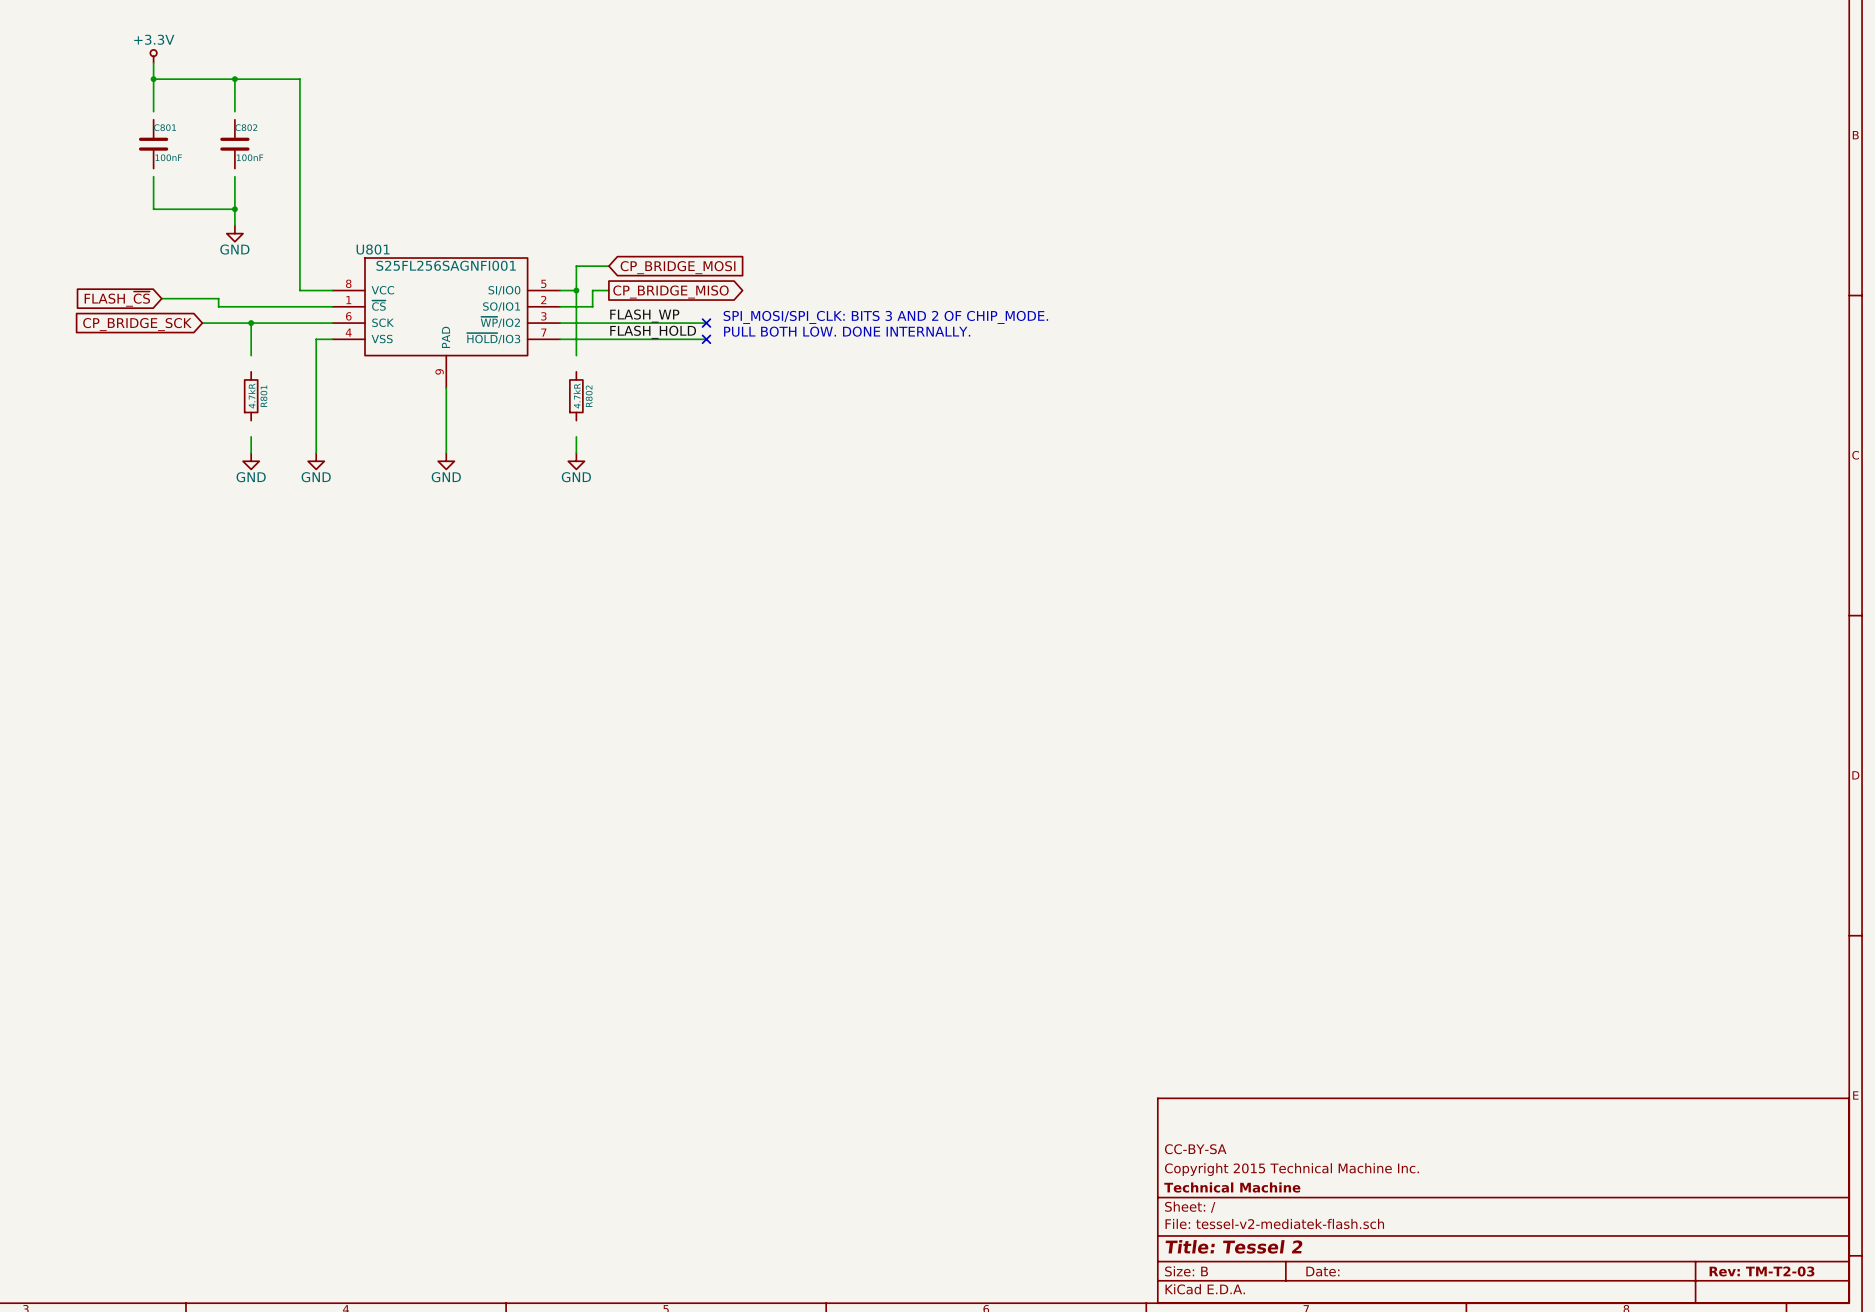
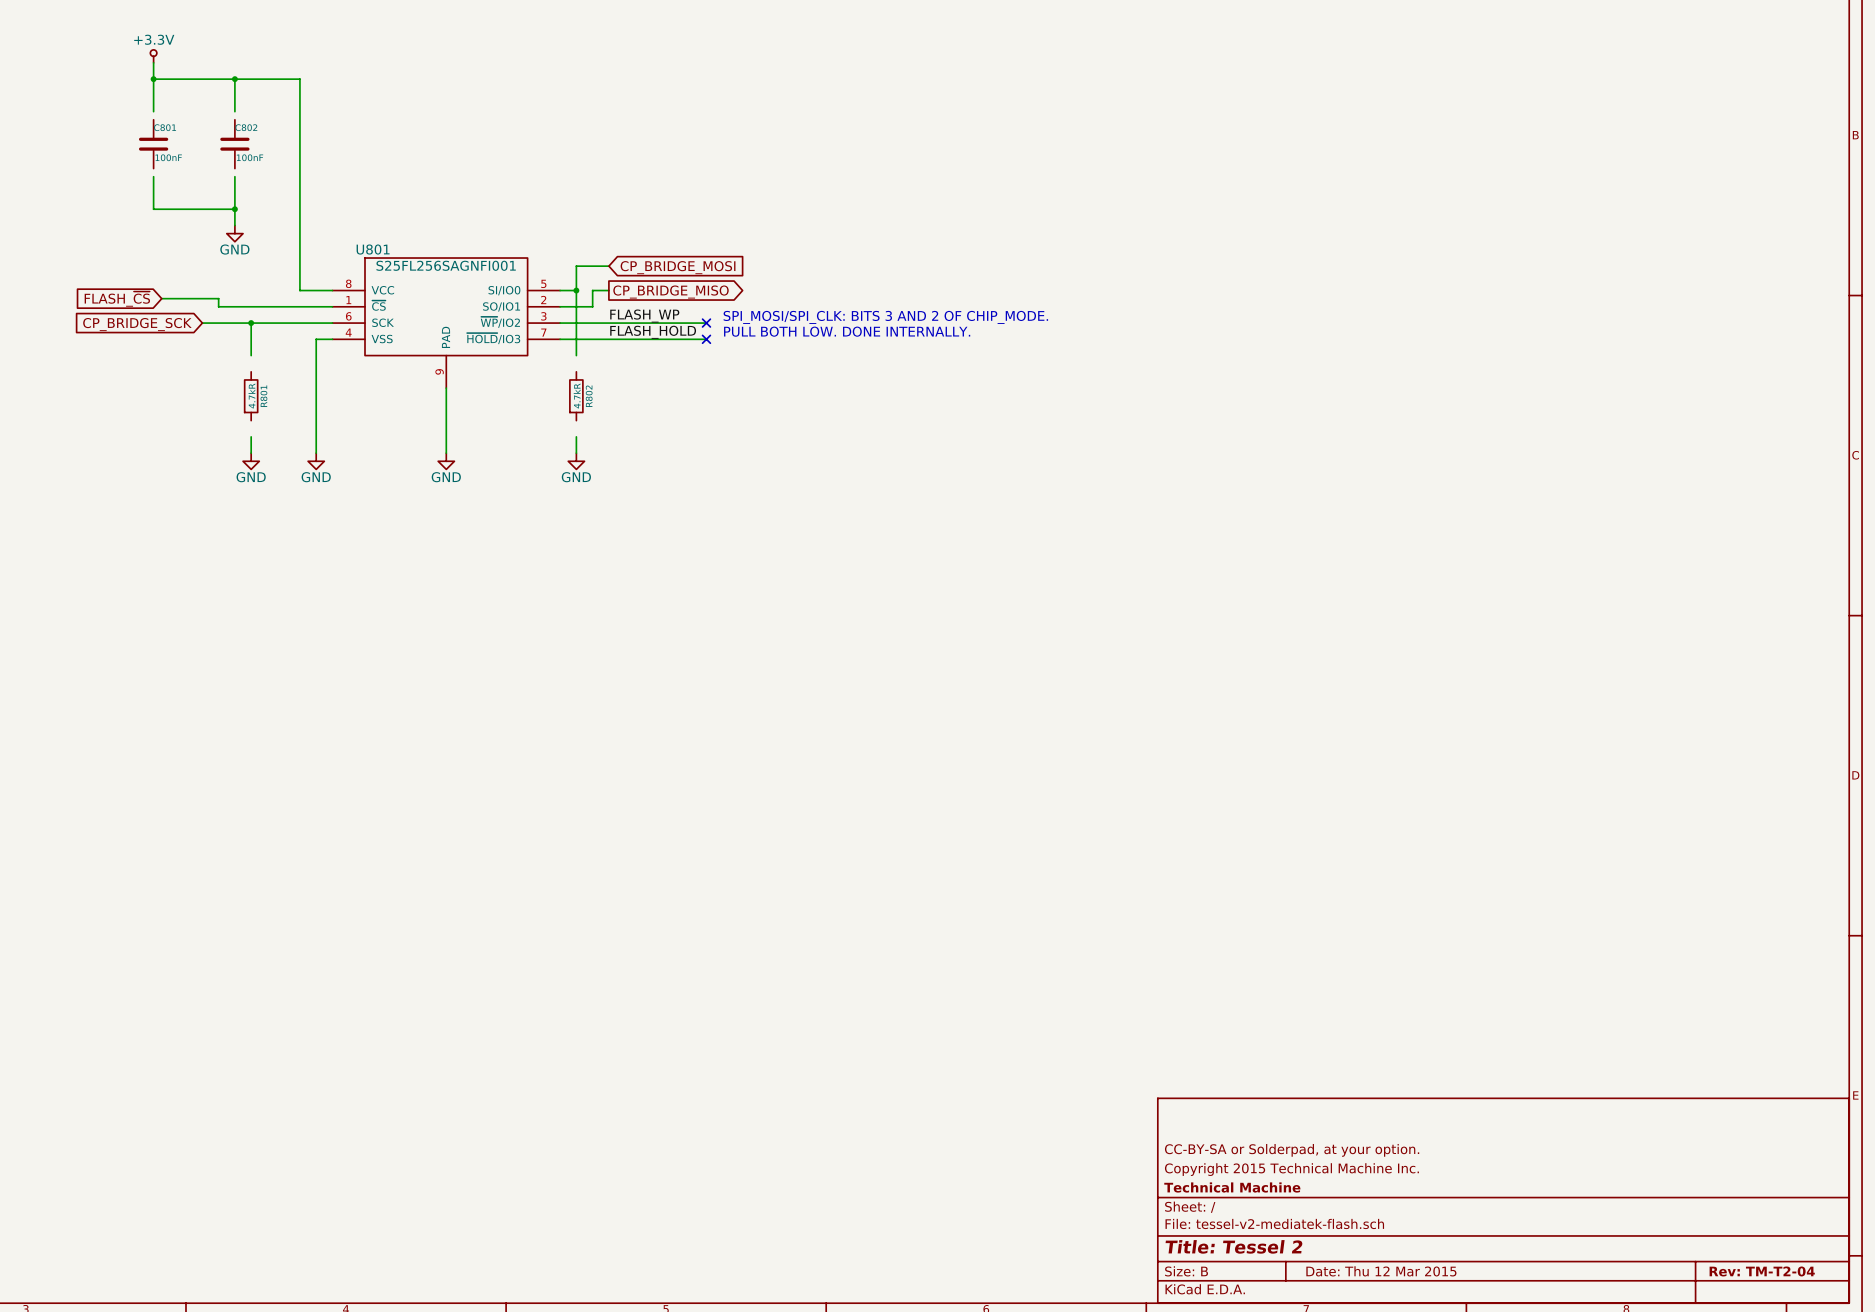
title block: CC-BY-SA (1195, 1149) -> CC-BY-SA or Solderpad, at your option. (1292, 1150)
title block: Date: (1322, 1271) -> Date: Thu 12 Mar 2015 (1381, 1271)
title block: Rev: TM-T2-03 (1761, 1271) -> Rev: TM-T2-04 (1762, 1271)

